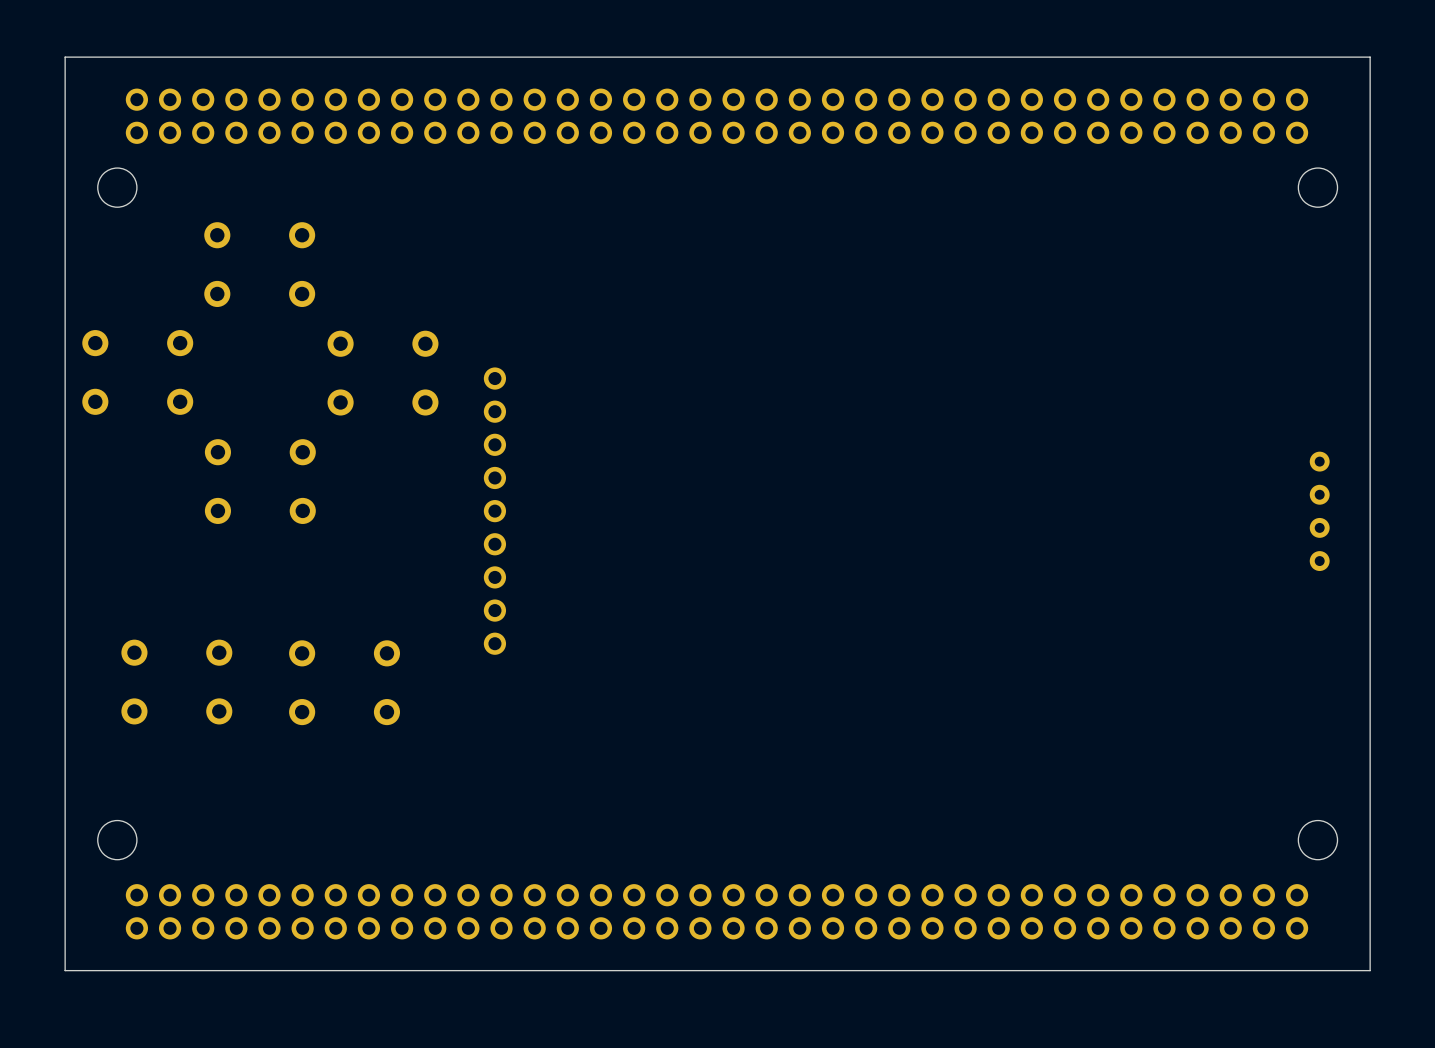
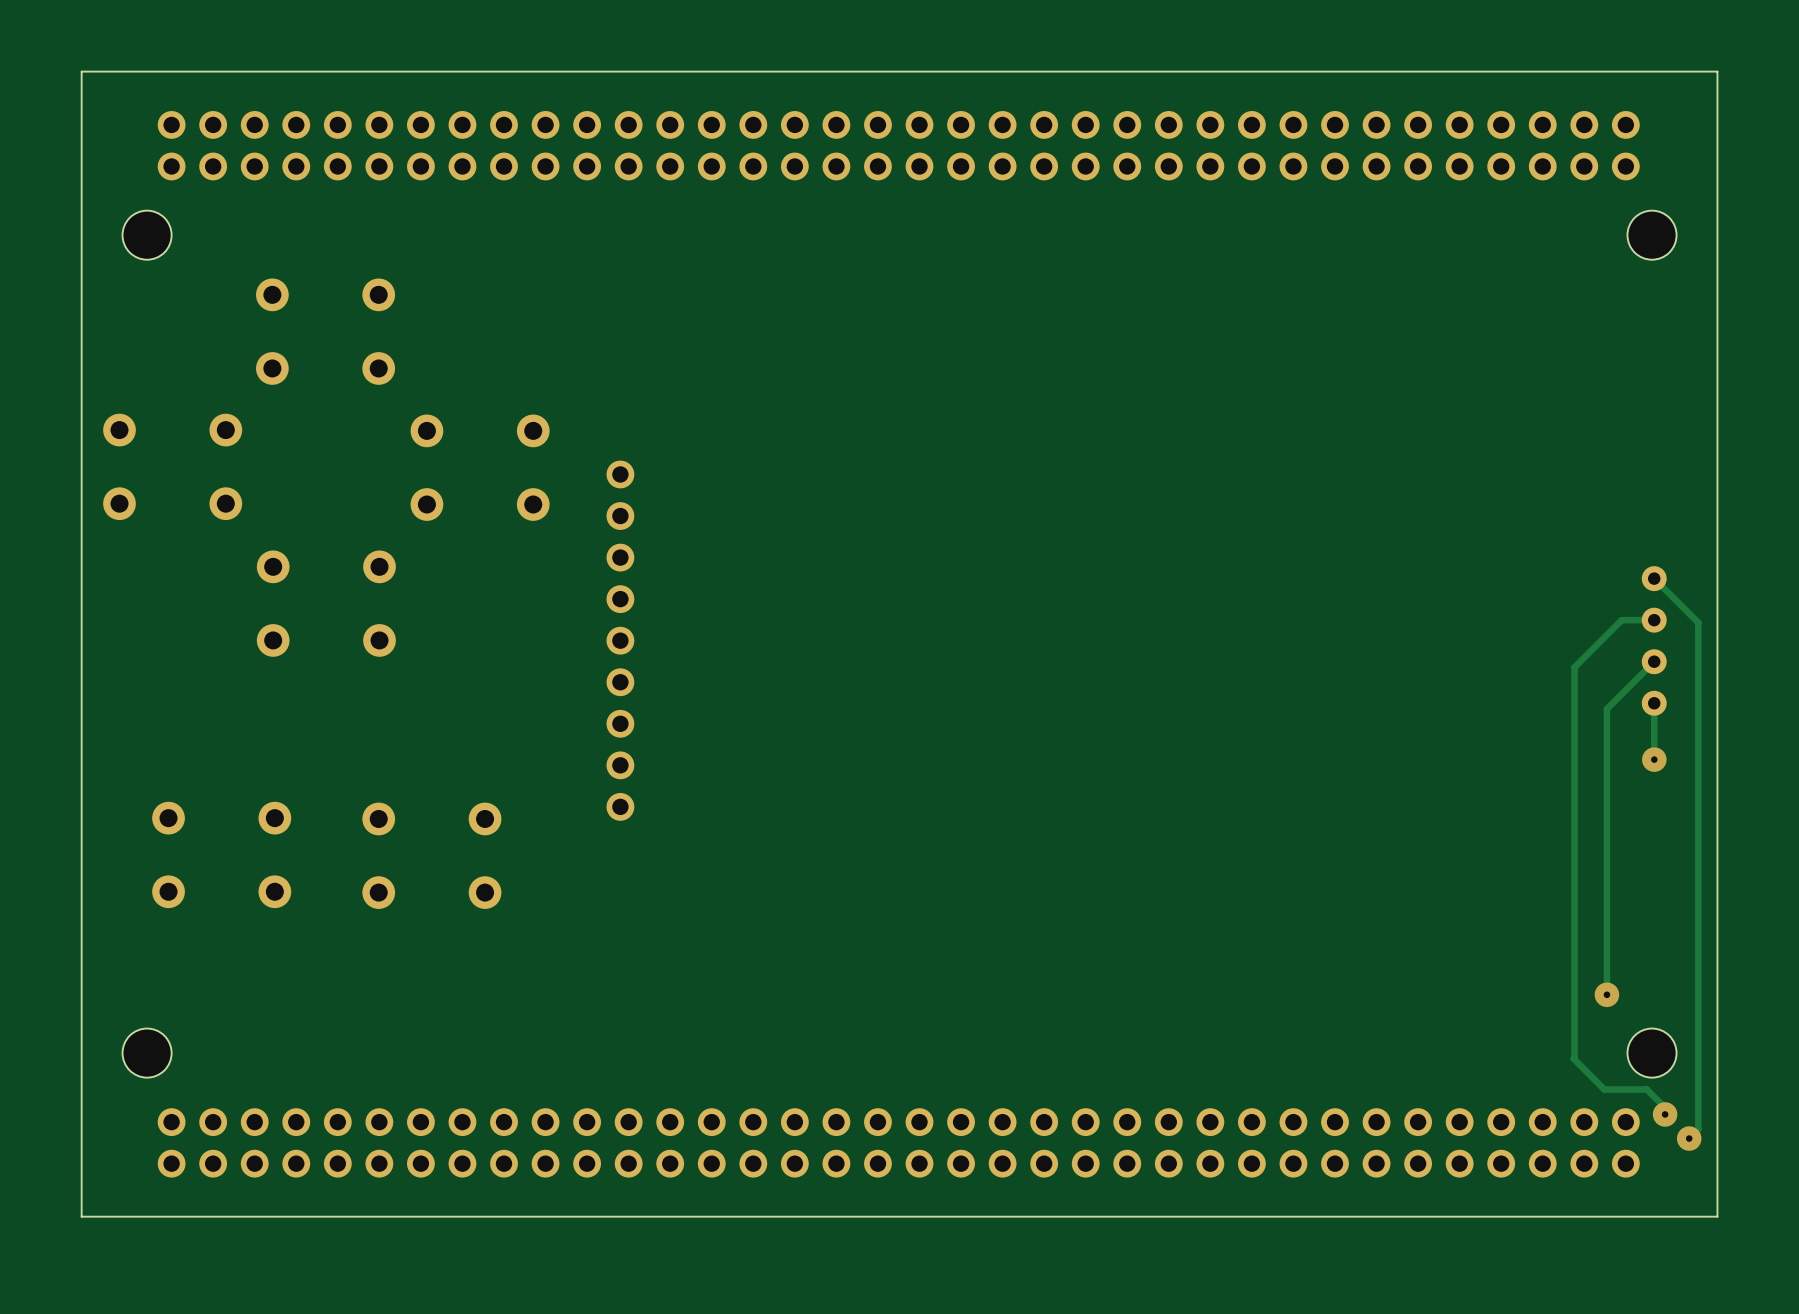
track: none -> (1654, 578) (1698, 622) (1698, 1129) (1689, 1138)
track: none -> (1654, 620) (1621, 620) (1574, 667) (1573, 1058) (1604, 1089) (1646, 1089) (1665, 1107) (1665, 1114)
track: none -> (1654, 661) (1606, 709) (1606, 994)
track: none -> (1654, 703) (1654, 759)
via: none -> (1654, 759)
via: none -> (1606, 994)
via: none -> (1665, 1114)
via: none -> (1689, 1138)

